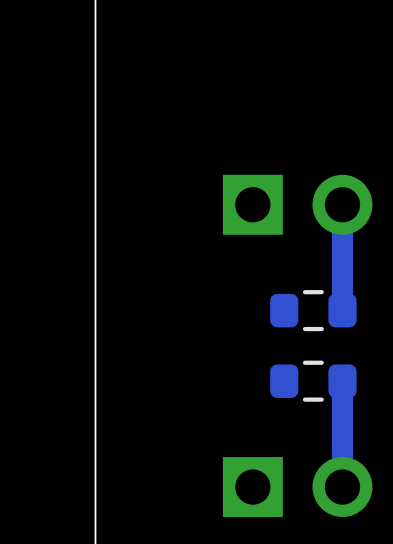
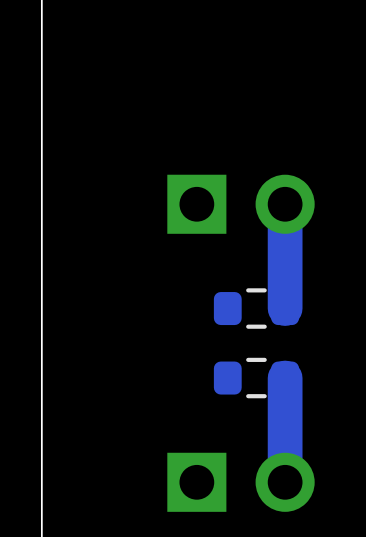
track width: thin (342, 204) (342, 310) -> thick (285, 204) (285, 308)
track width: thin (342, 381) (342, 487) -> thick (285, 378) (285, 482)

